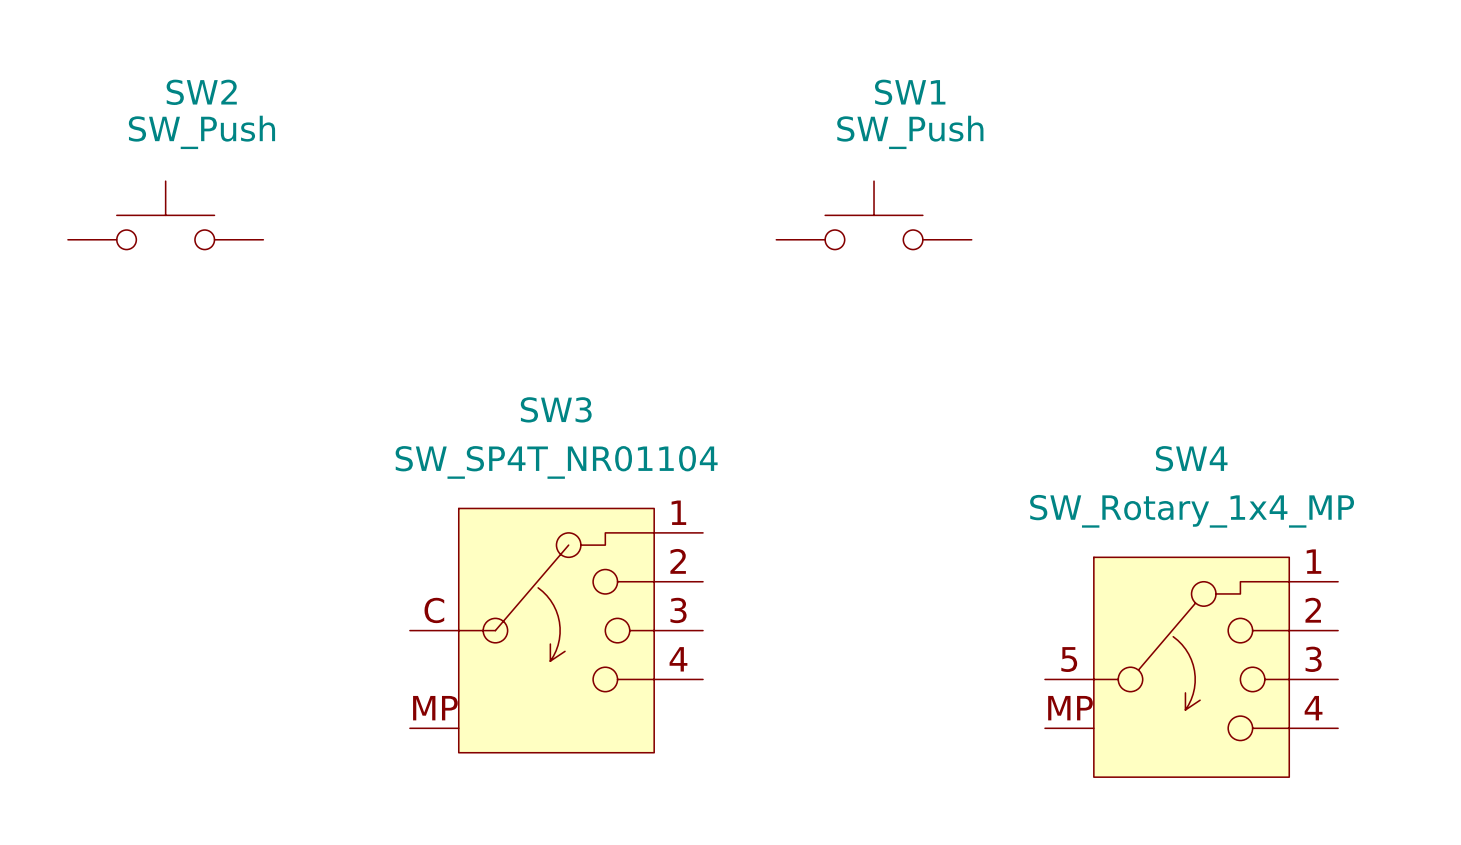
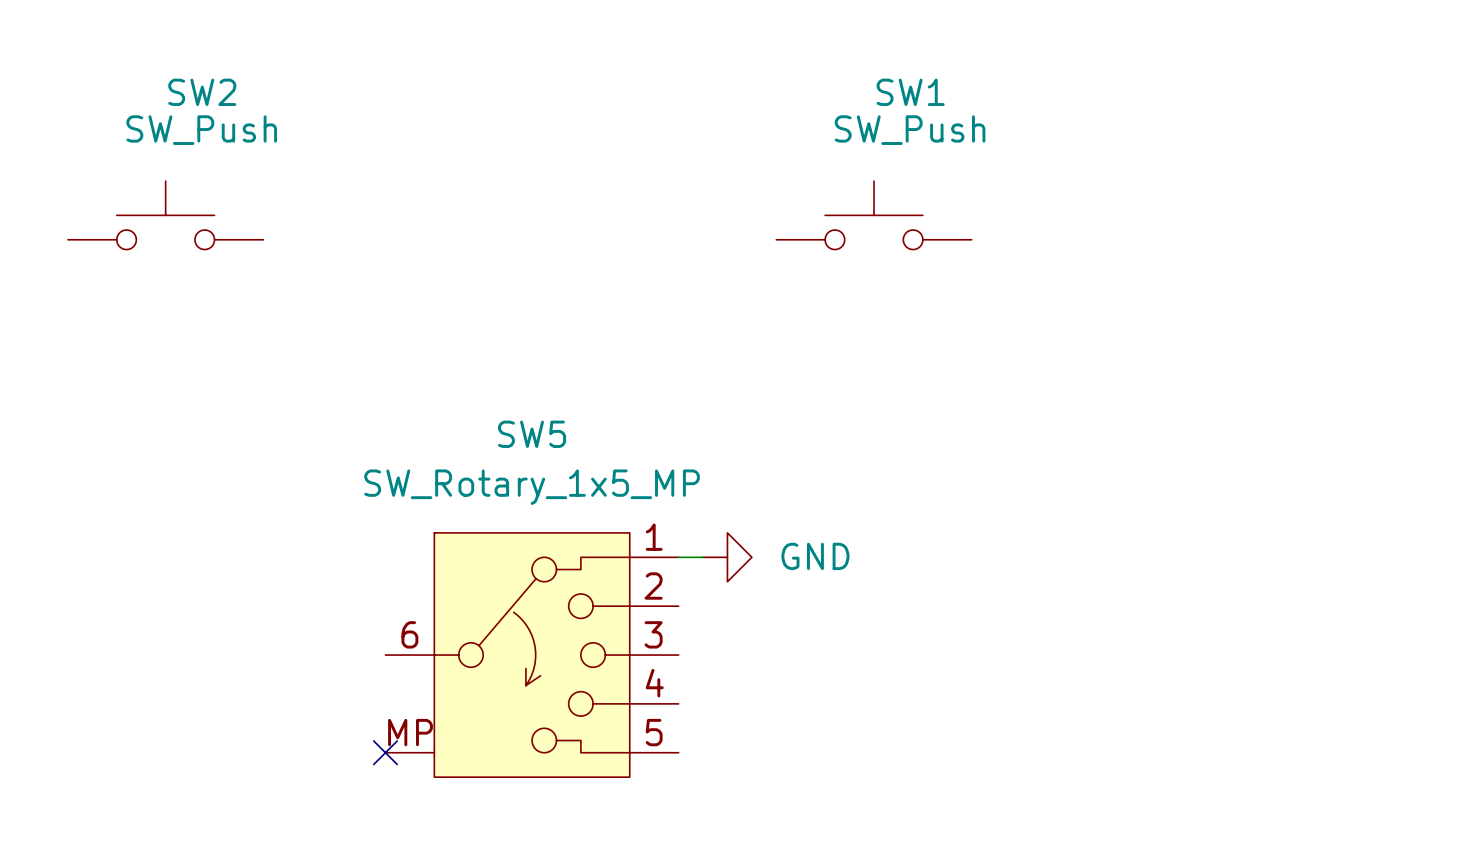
wire: none -> (678, 557) (703, 557)
power symbol: none -> GND (727, 557)
SW3: SW_SP4T_NR01104 (556, 630) -> none
SW5: none -> SW_Rotary_1x5_MP (532, 655)
SW4: SW_Rotary_1x4_MP (1191, 667) -> none
no-connect mark: none -> (385, 752)

